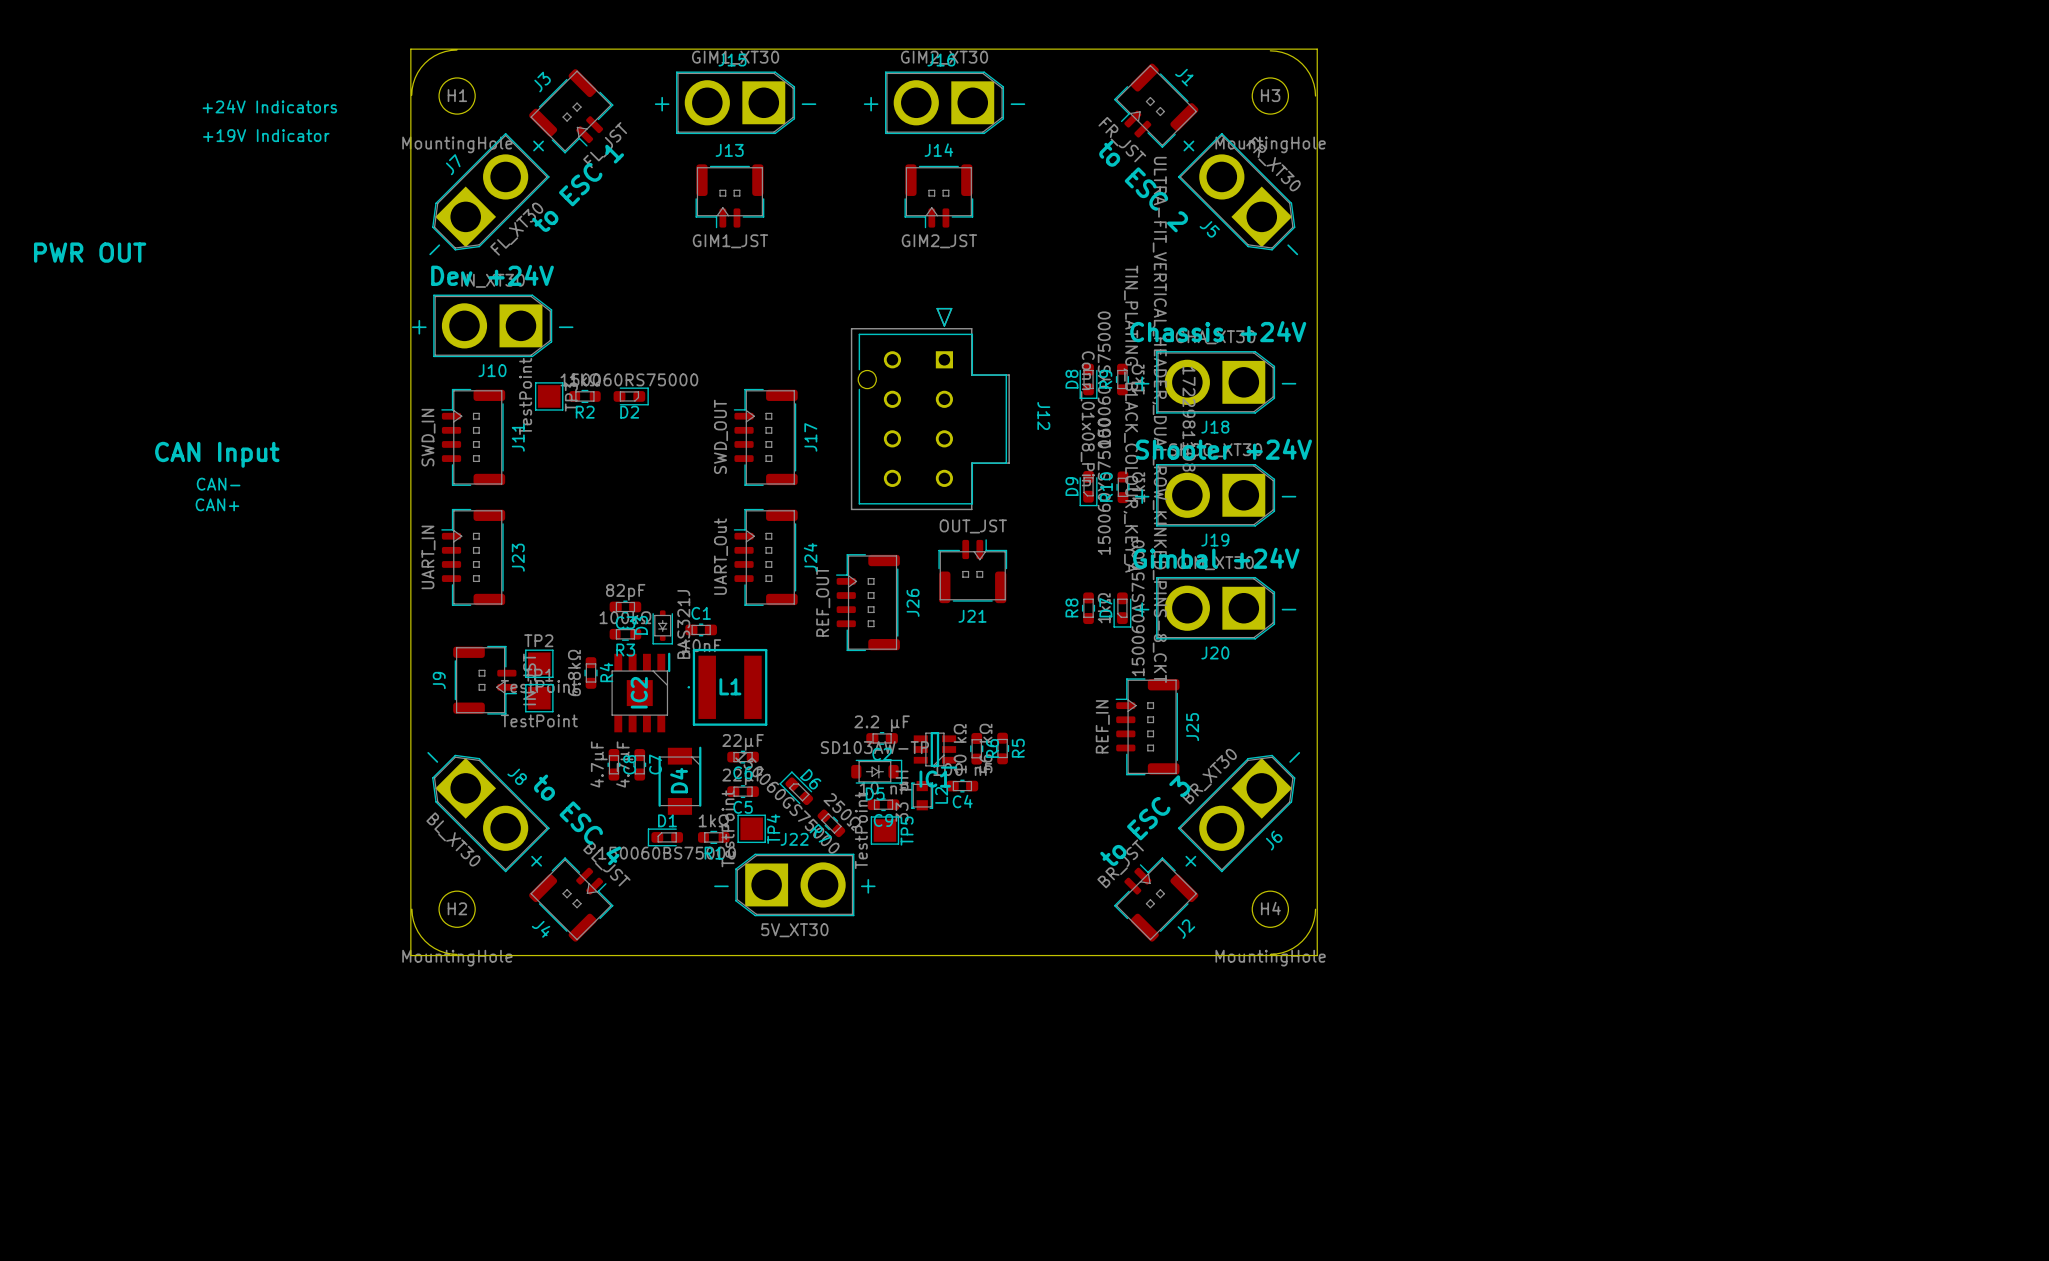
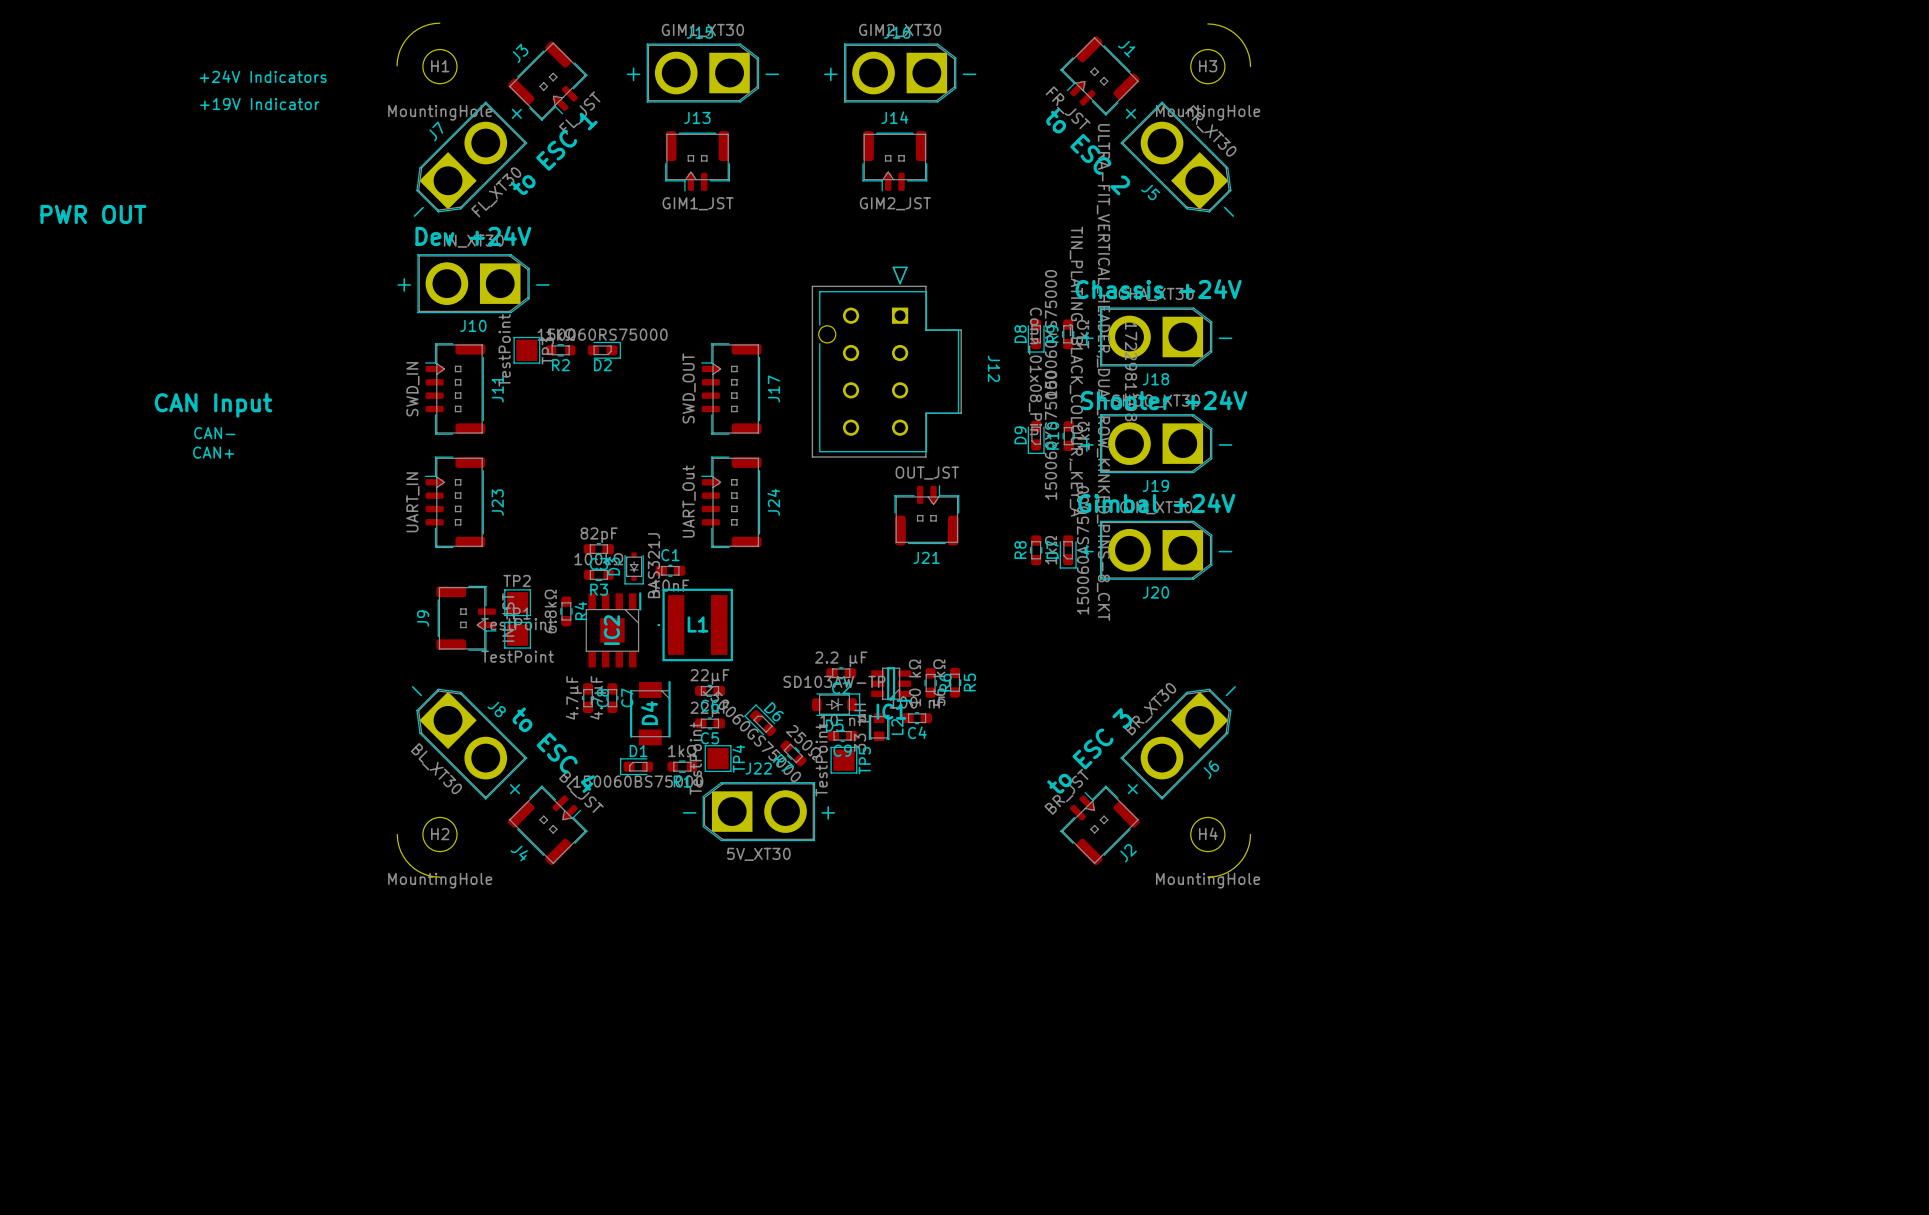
board edge: (410, 49) (1317, 49) (1317, 955) (410, 955) (410, 49) -> none
J26: REF_OUT (867, 602) -> none
J25: REF_IN (1147, 726) -> none

